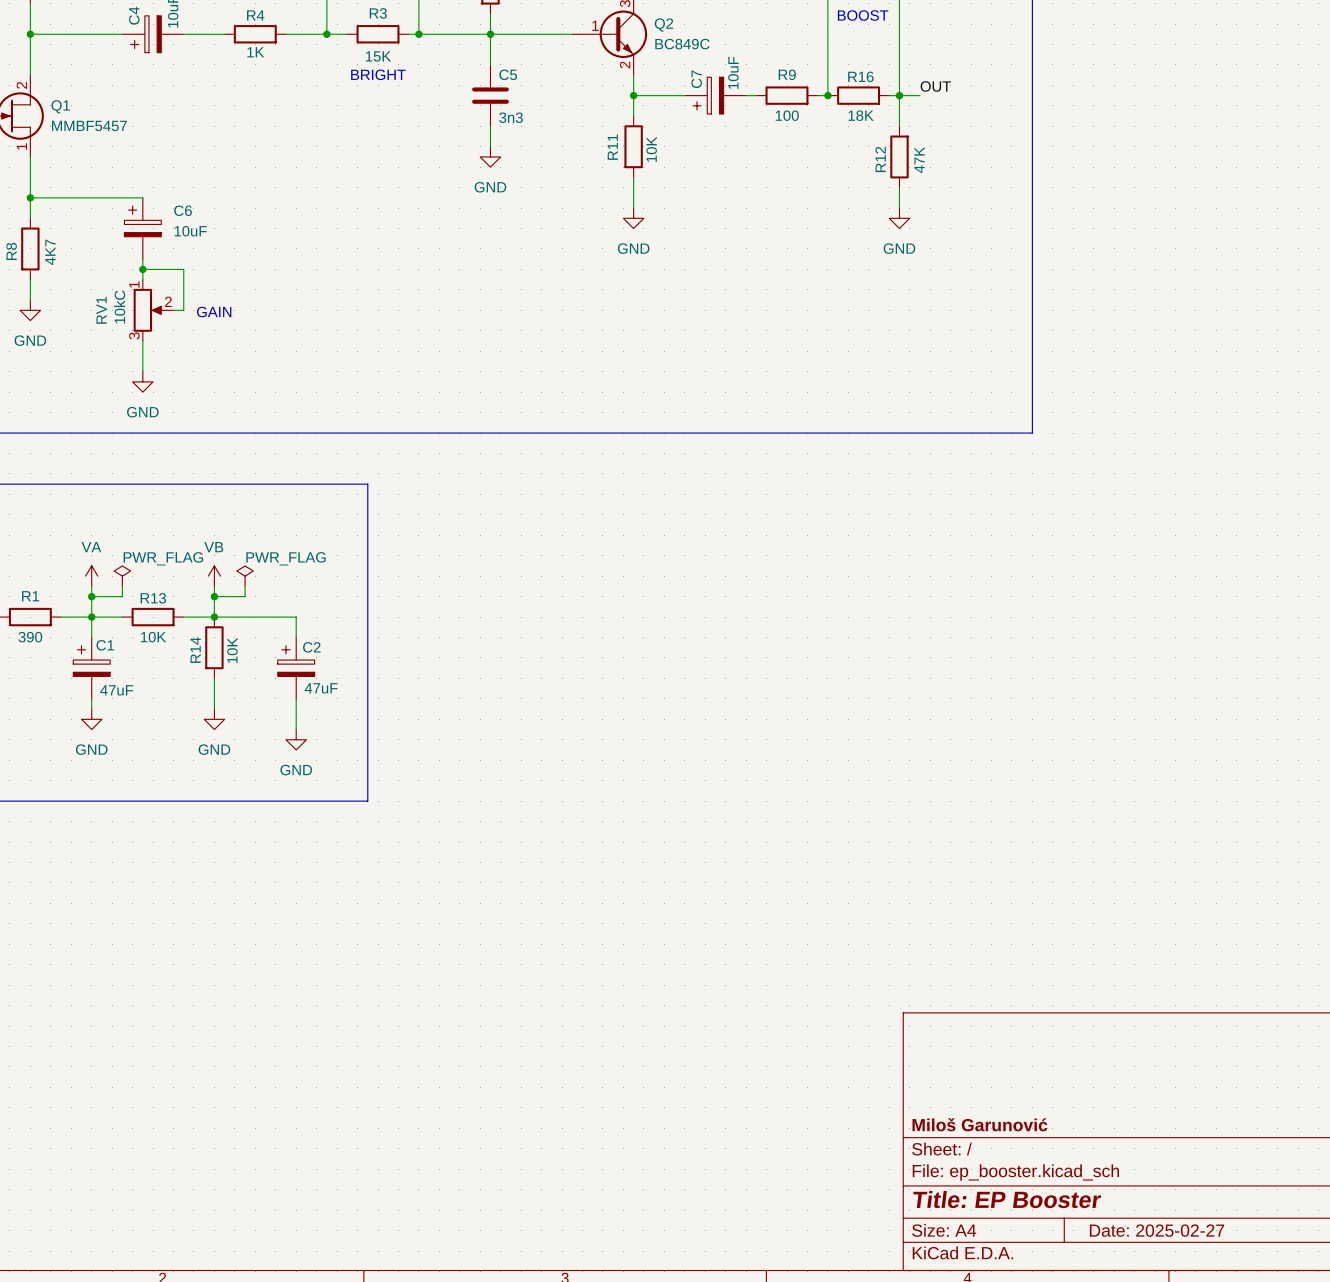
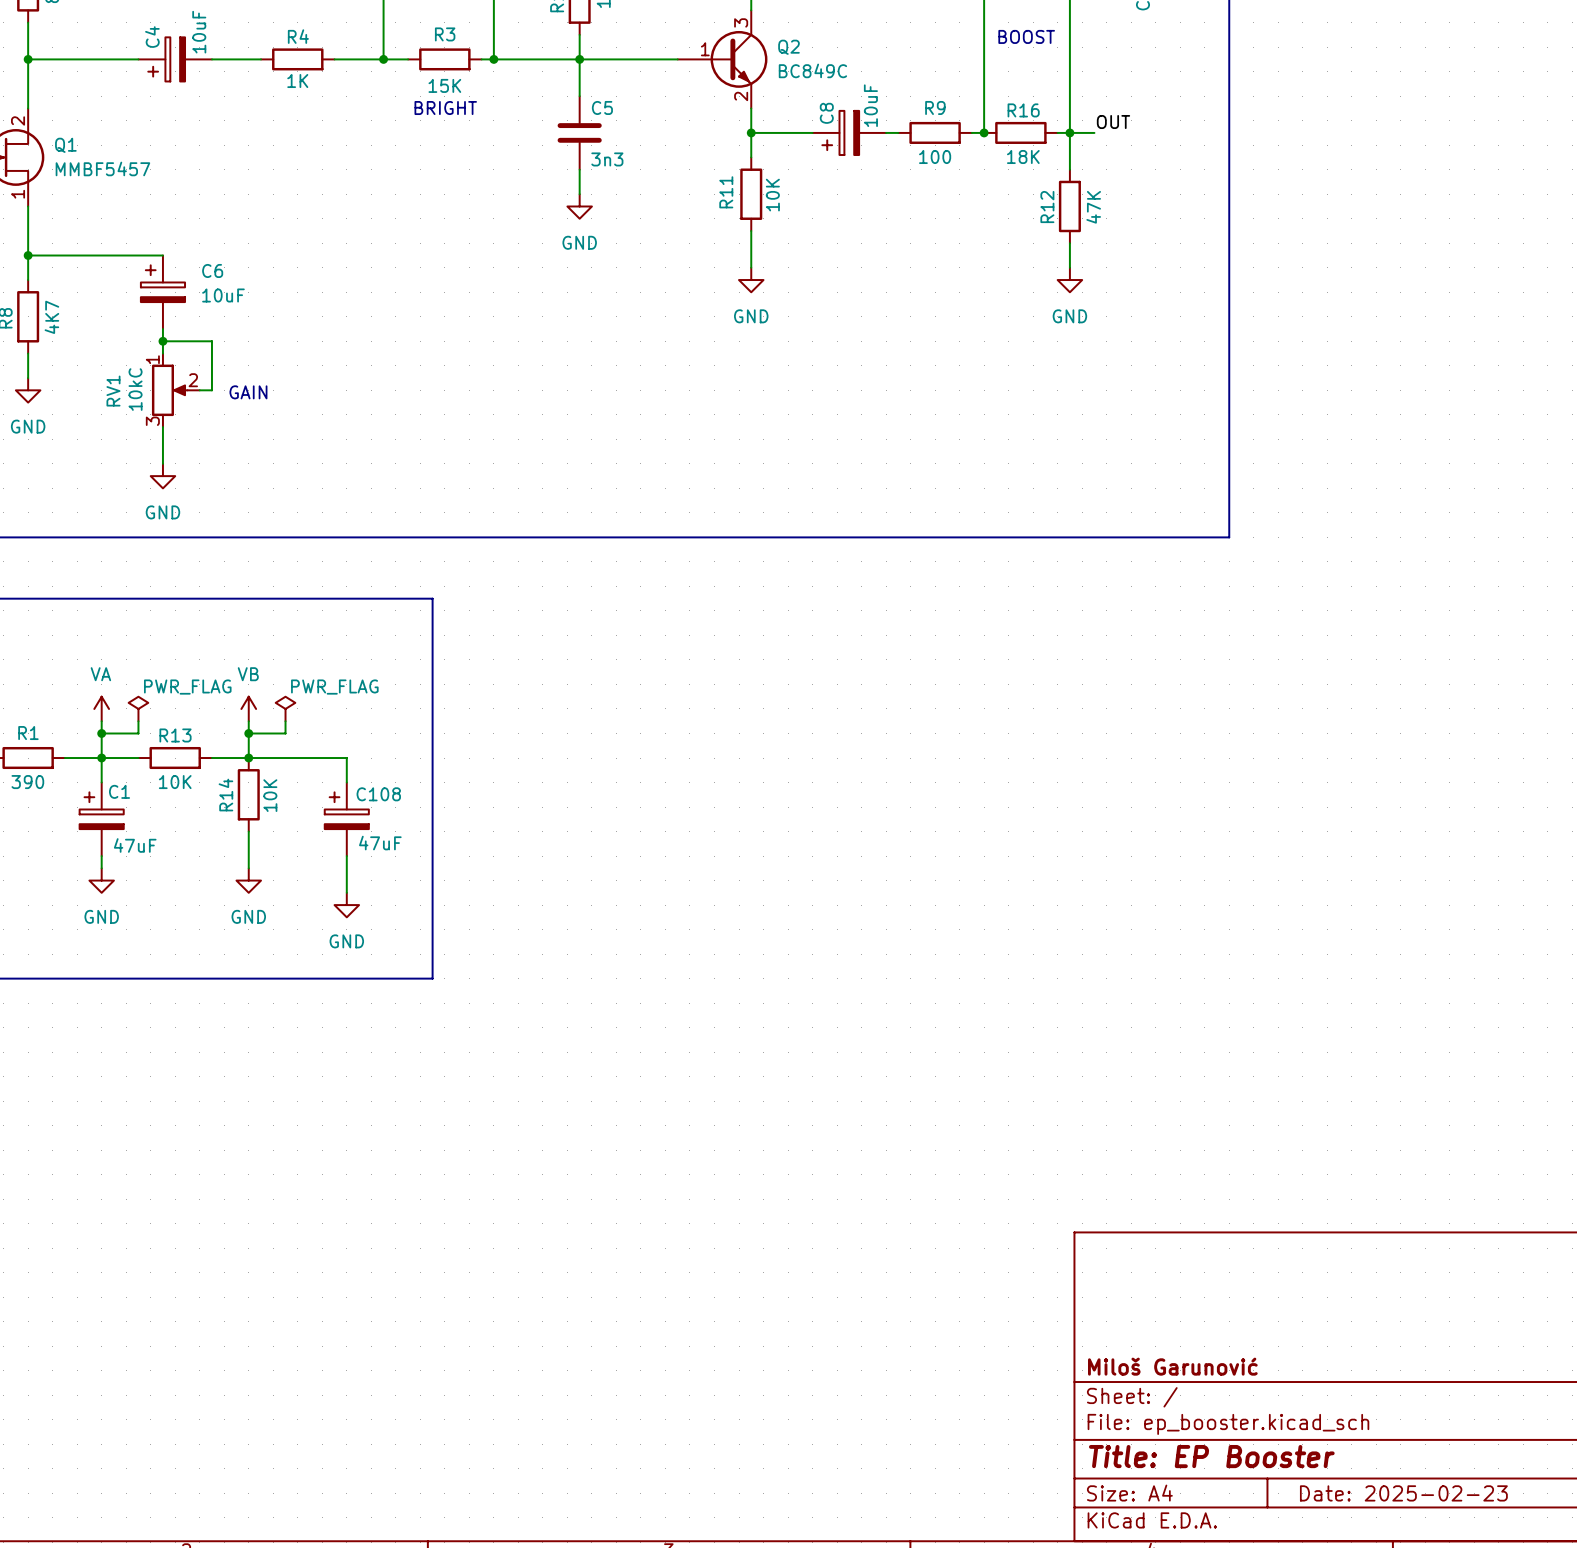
C7 name: C7 (696, 79) -> C8 (826, 113)
C2 name: C2 (311, 647) -> C108 (378, 794)
title block: Date: 2025-02-27 (1157, 1230) -> Date: 2025-02-23 (1403, 1493)

